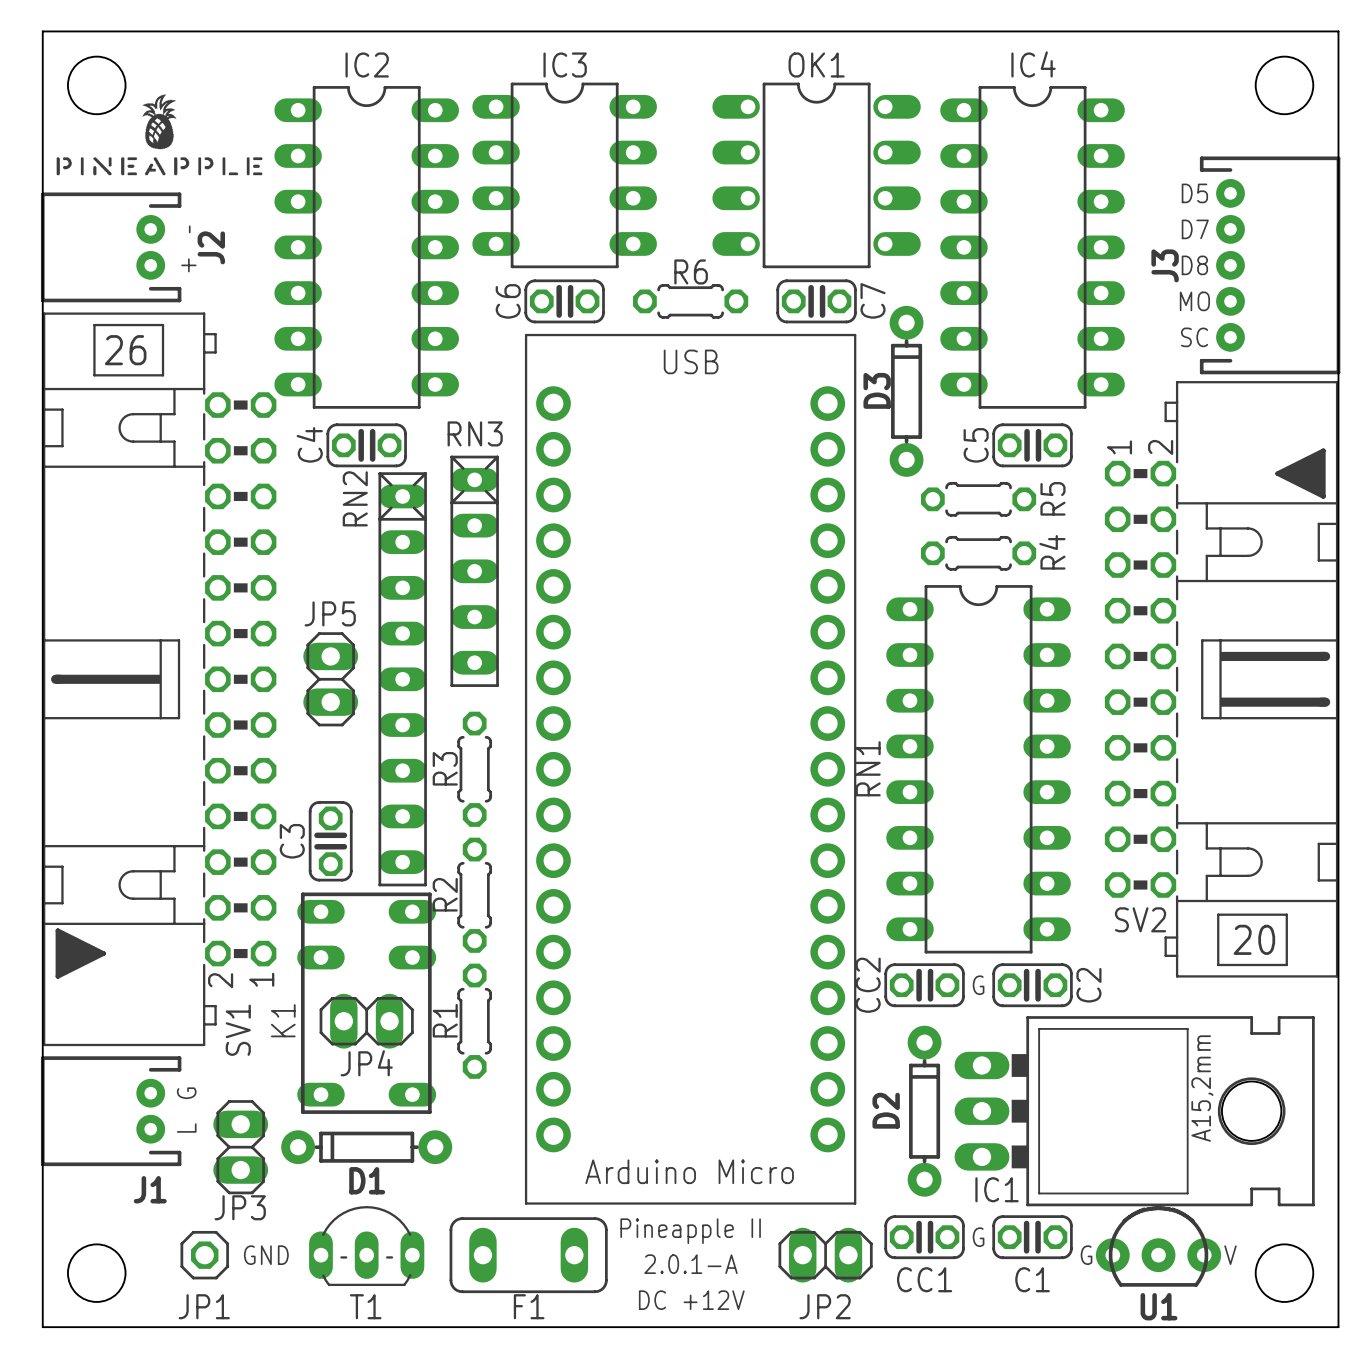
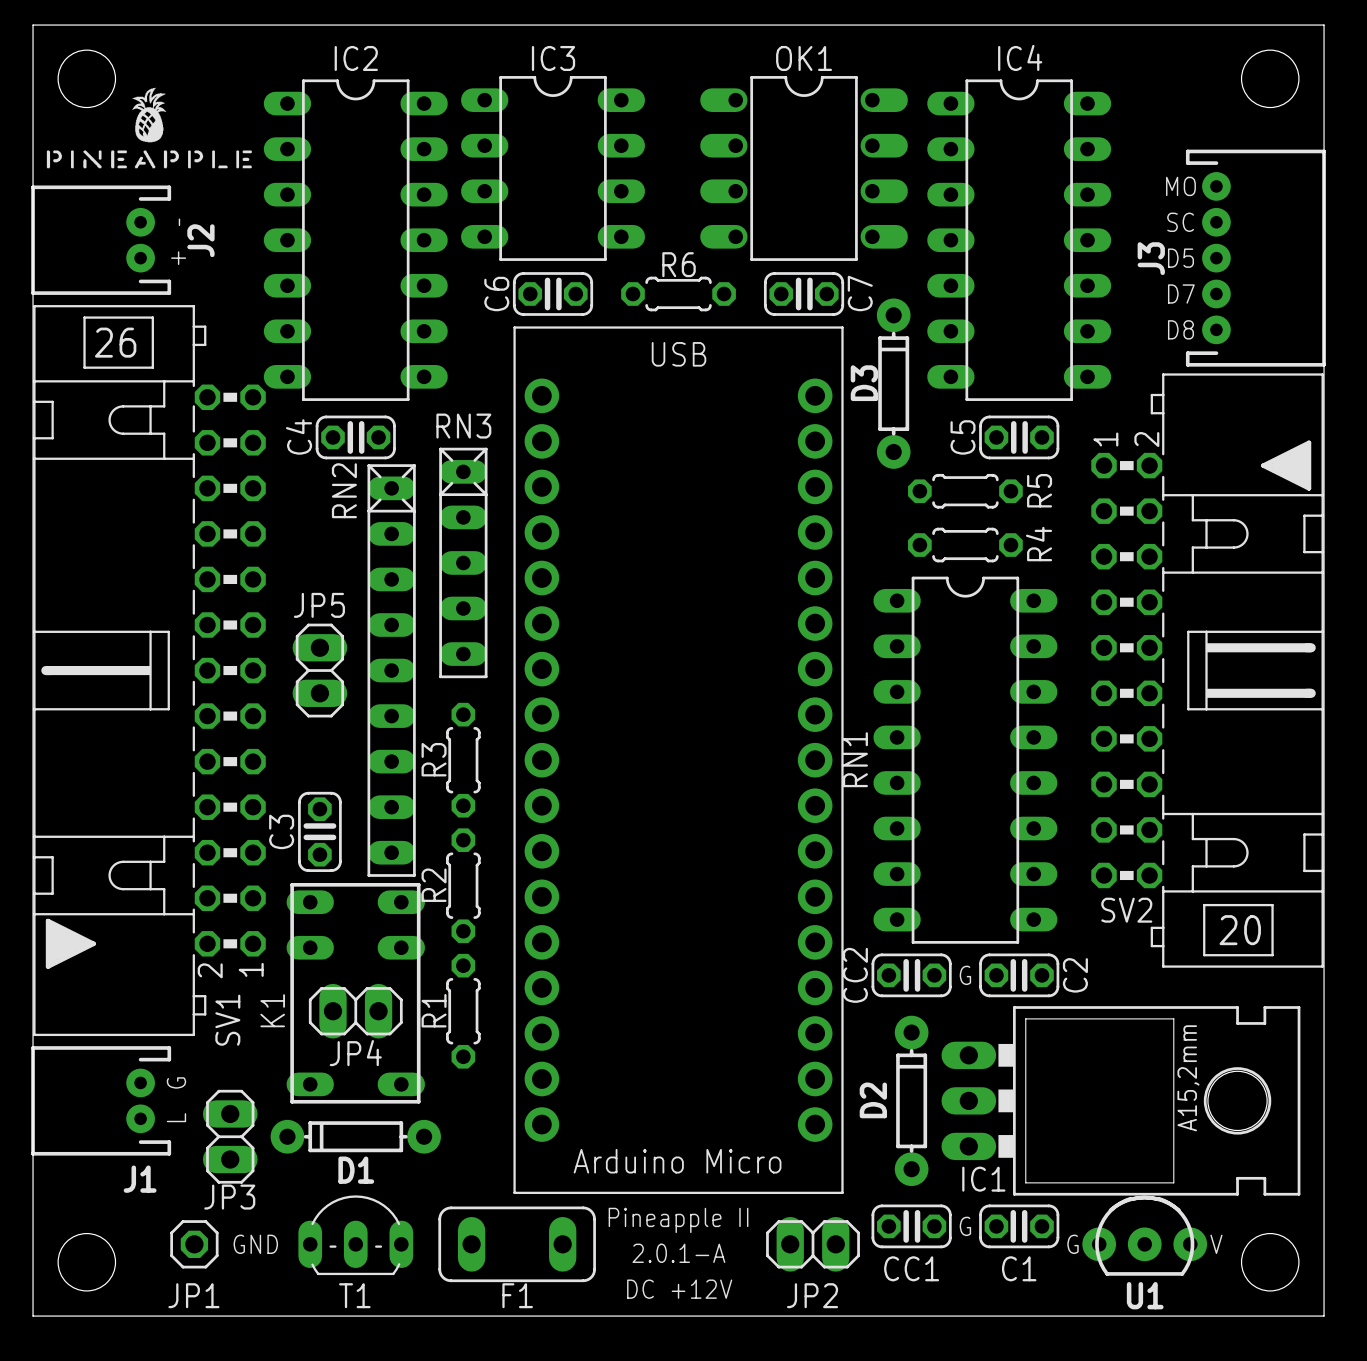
text: D5 (1194, 193) -> MO (1180, 186)
text: D7 (1195, 229) -> SC (1180, 222)
text: D8 (1194, 265) -> D5 (1180, 258)
text: MO (1194, 301) -> D7 (1181, 294)
text: SC (1194, 337) -> D8 (1180, 329)

